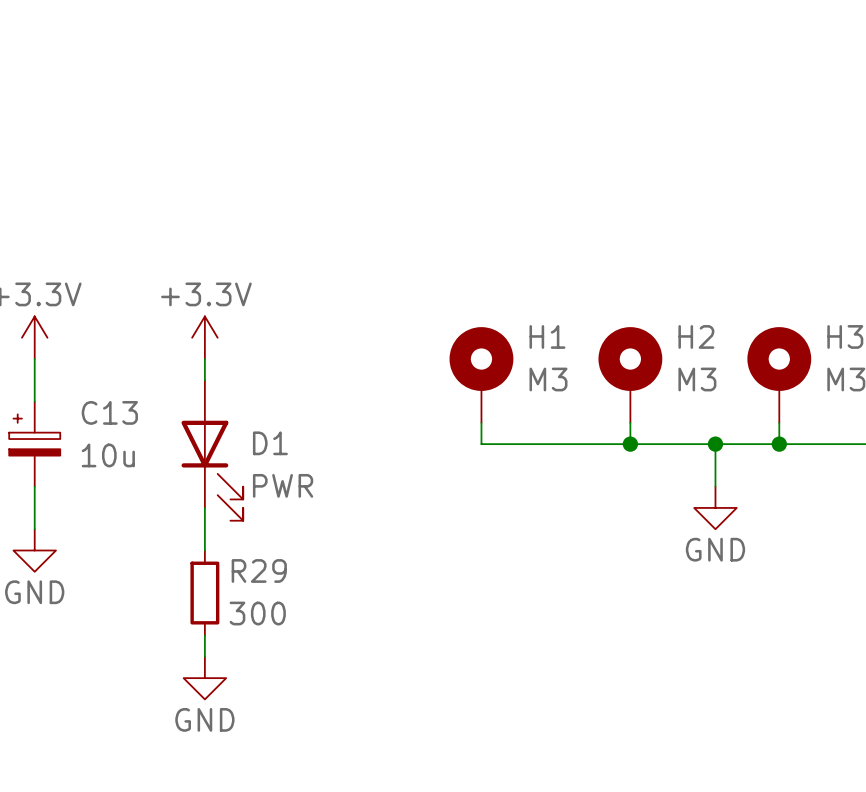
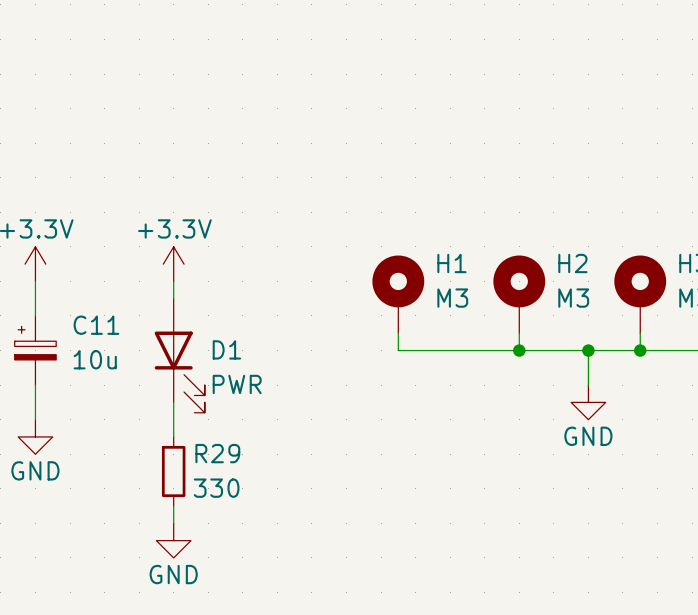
C13 name: C13 (109, 412) -> C11 (96, 325)
R29 value: 300 (257, 613) -> 330 (216, 488)

